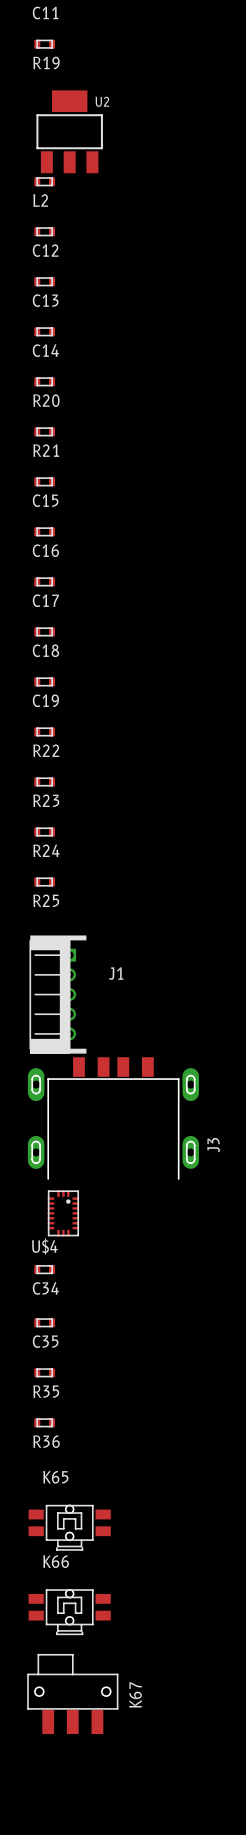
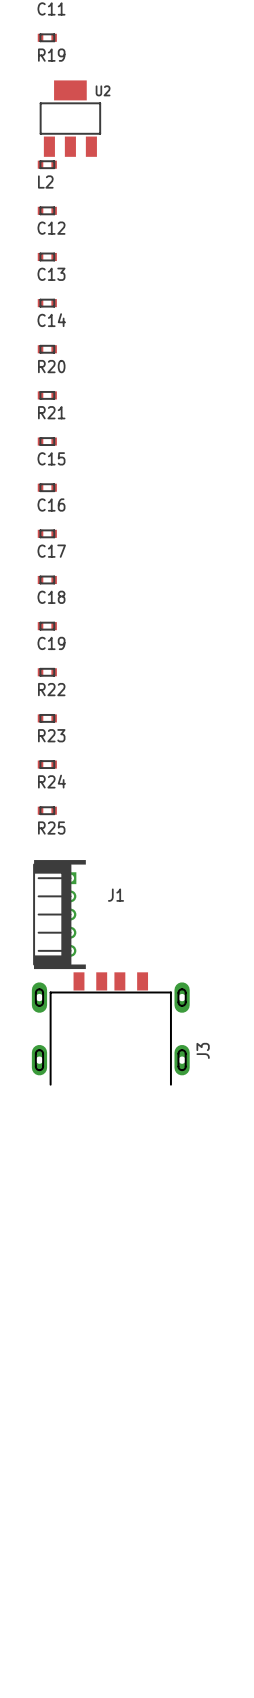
U$4: (63, 1213) -> none
C34: (44, 1269) -> none
C35: (44, 1322) -> none
R35: (44, 1372) -> none
R36: (44, 1422) -> none
K65: (69, 1527) -> none
K66: (69, 1612) -> none
K67: (72, 1694) -> none

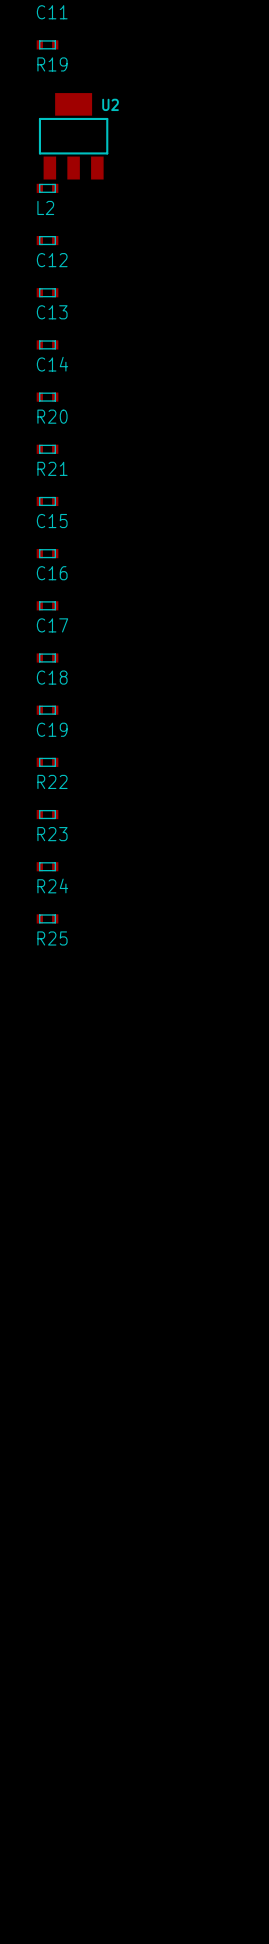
J1: (59, 914) -> none
J3: (110, 1028) -> none

